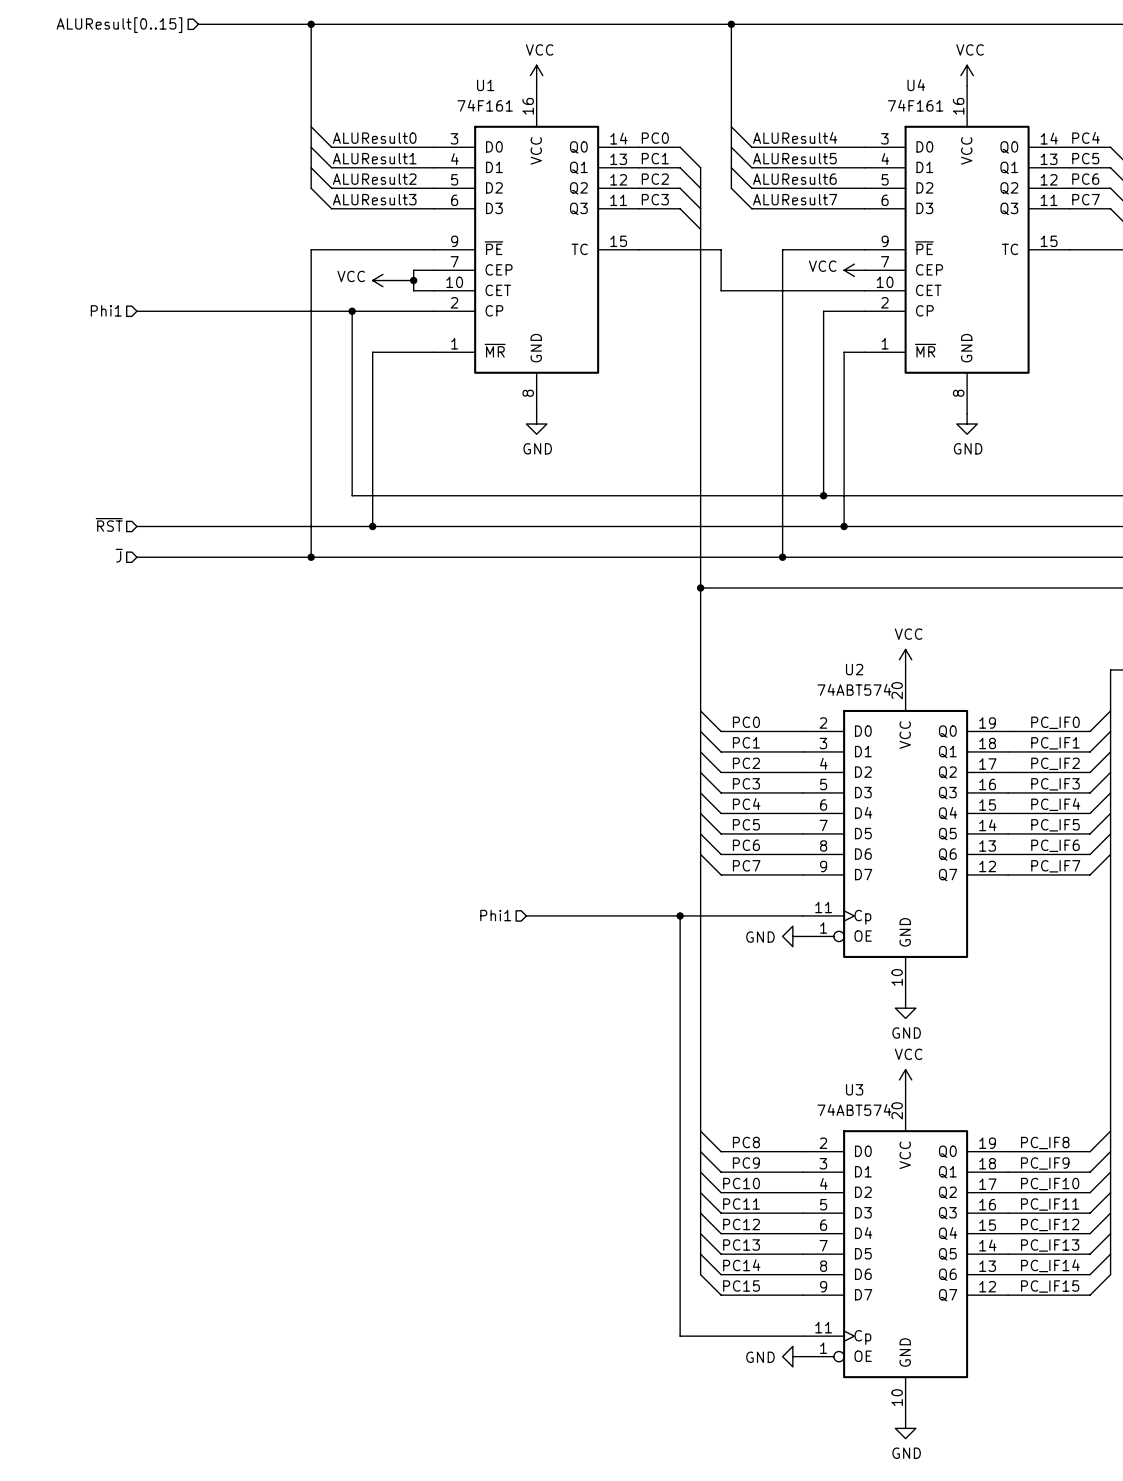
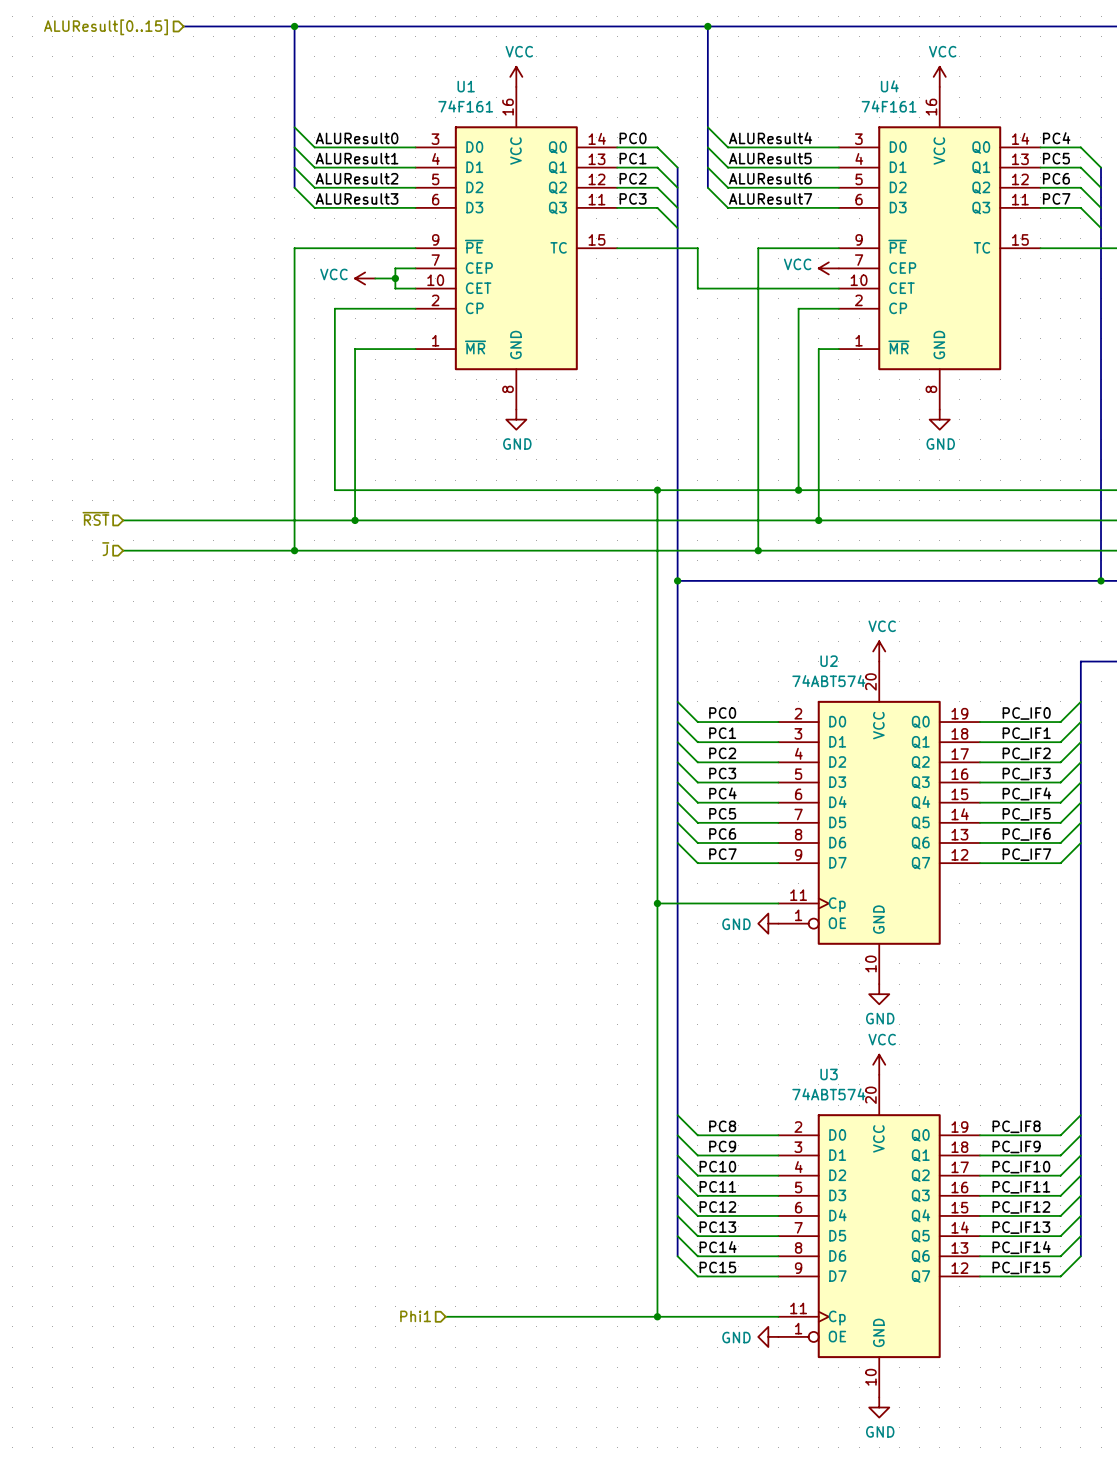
hierarchical label: Phi1 (106, 310) -> none
wire: (136, 311) (352, 311) -> none
junction: (352, 311) -> none
junction: none -> (657, 490)
hierarchical label: Phi1 (495, 915) -> none
wire: (526, 915) (680, 915) -> (657, 490) (657, 903)
hierarchical label: none -> Phi1 (415, 1316)
wire: none -> (445, 1316) (657, 1316)
junction: none -> (657, 1316)

